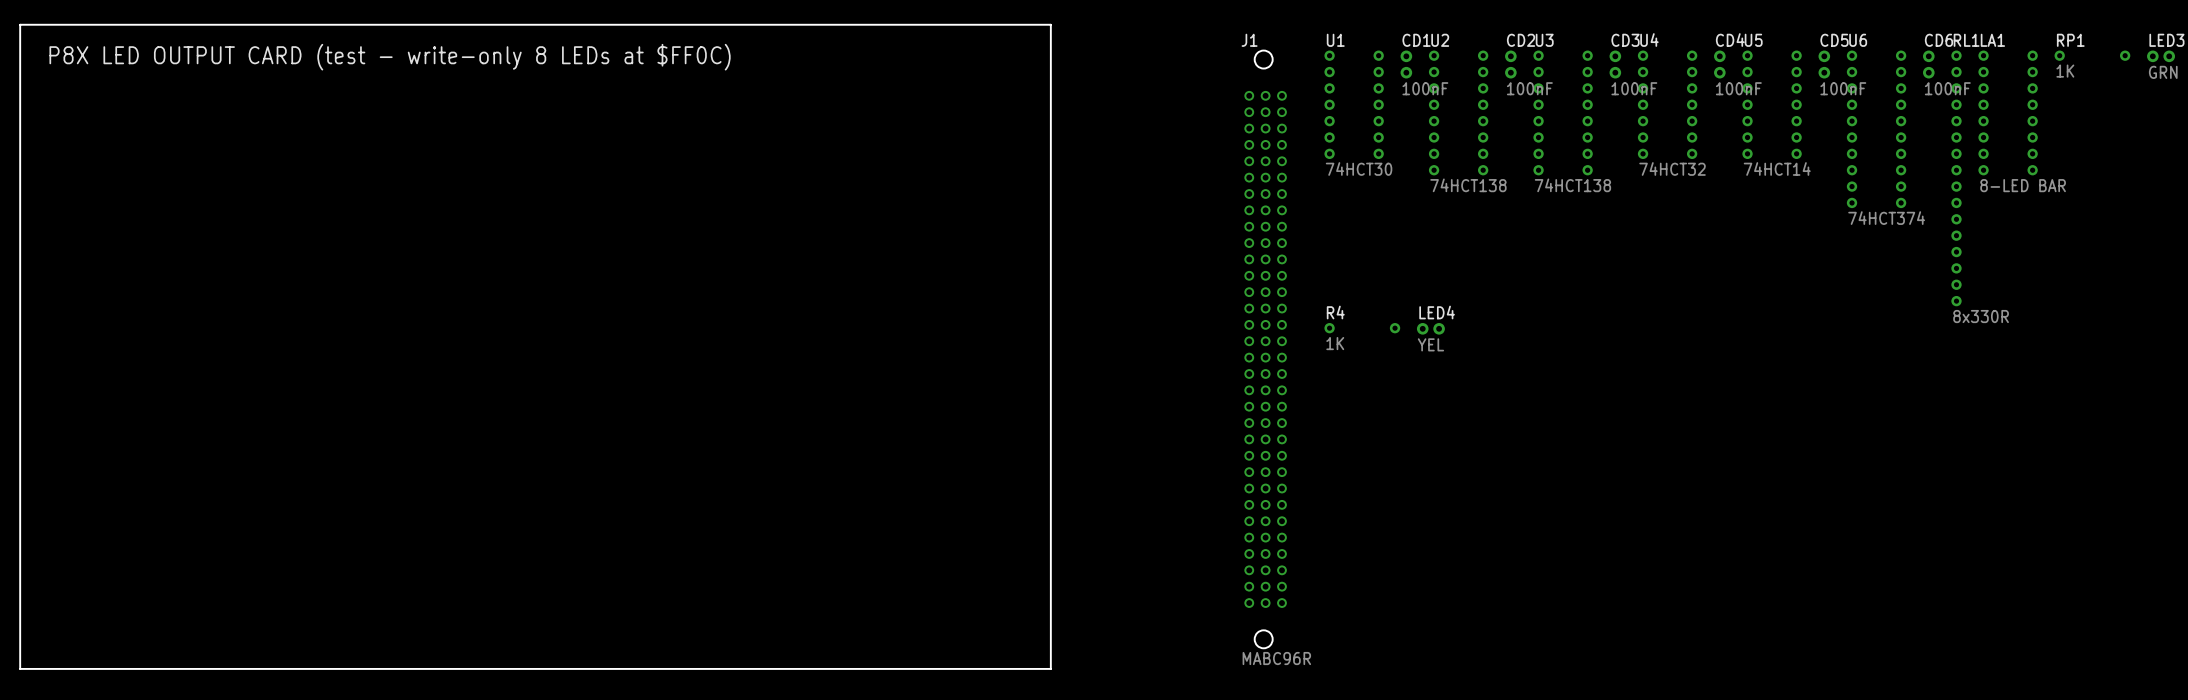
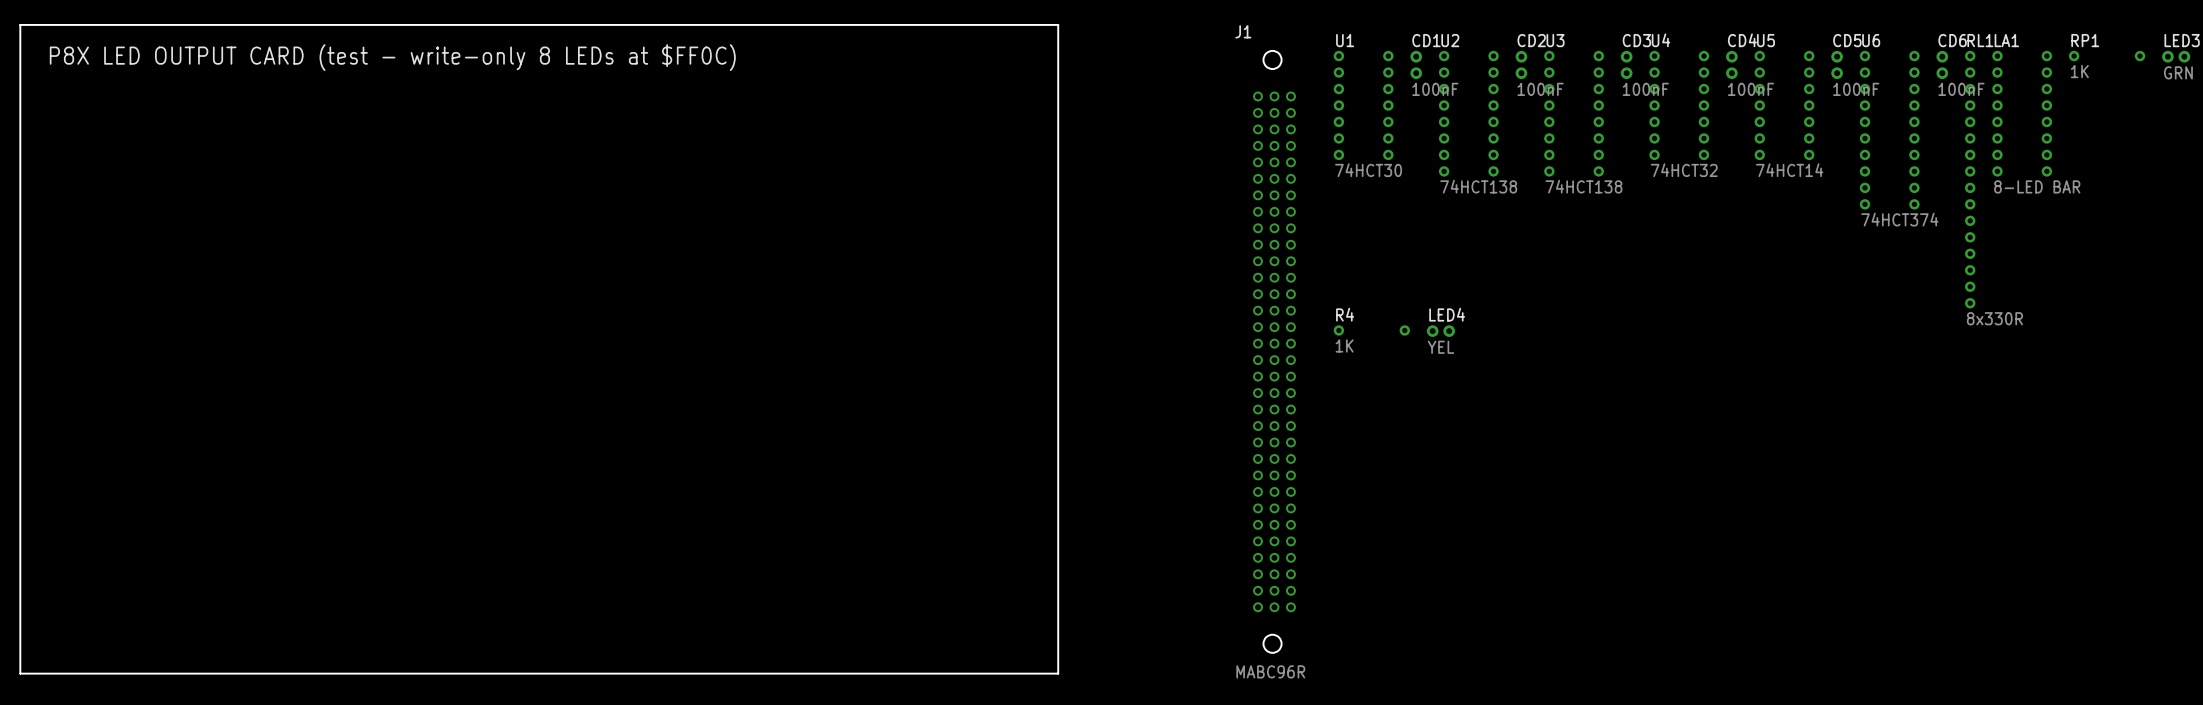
J1 name position: J1 (1249, 40) -> J1 (1243, 31)
J1 value position: MABC96R (1276, 658) -> MABC96R (1270, 671)

